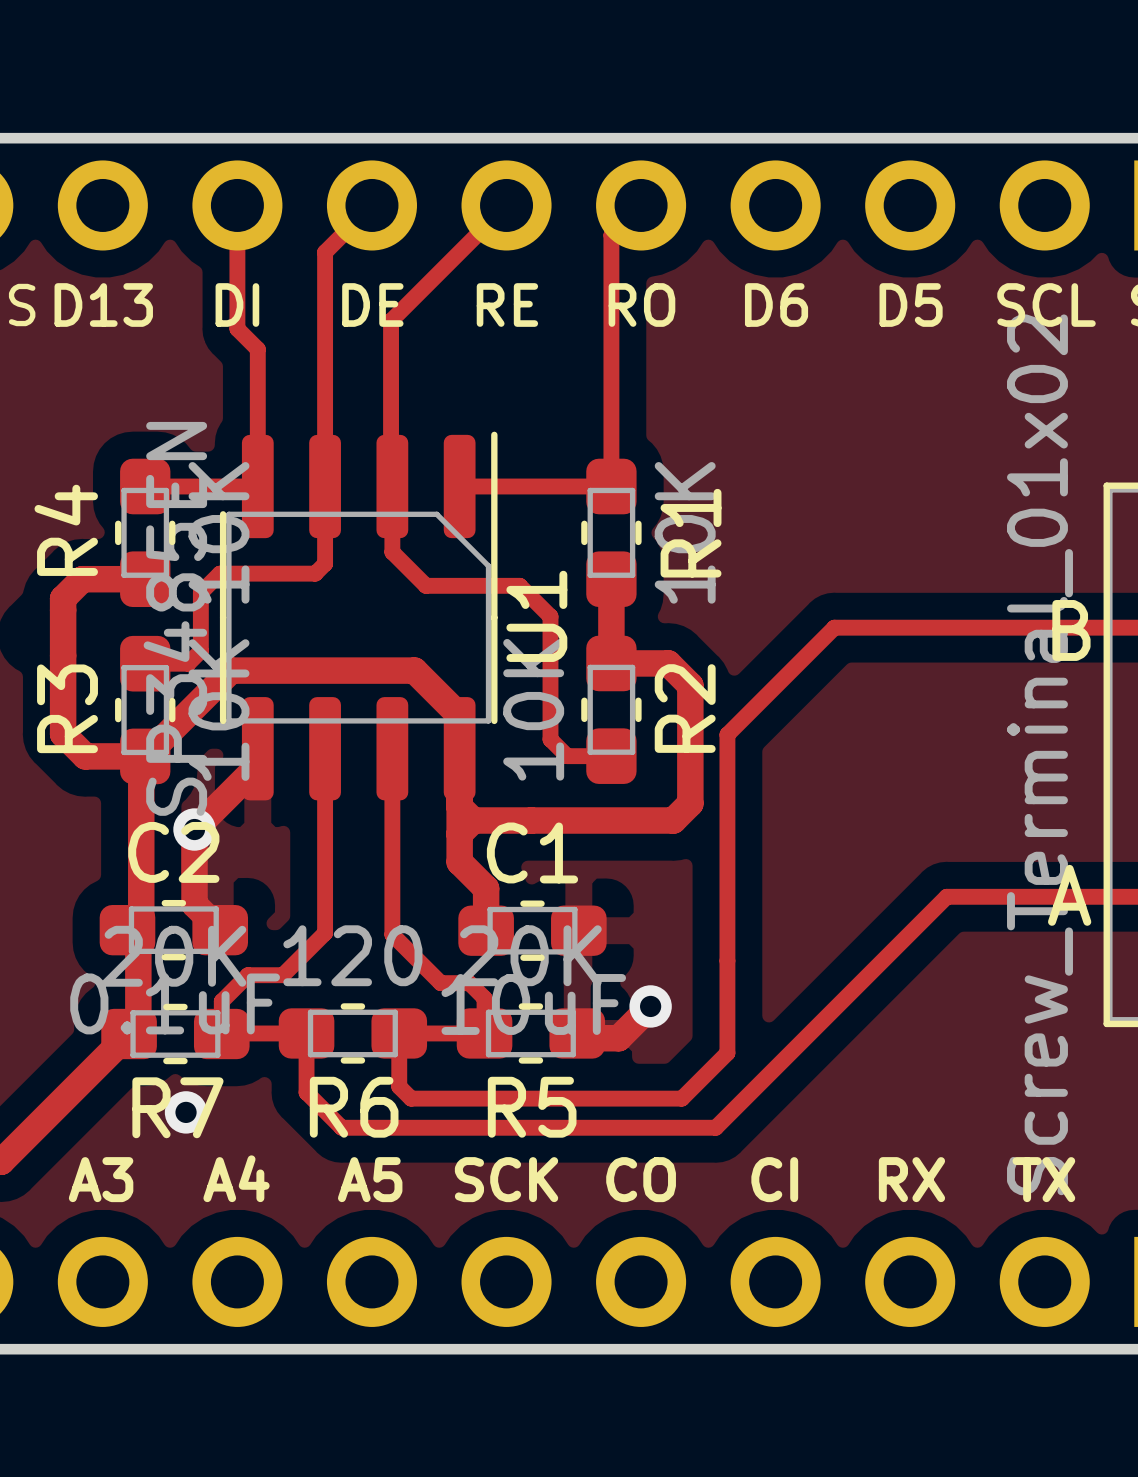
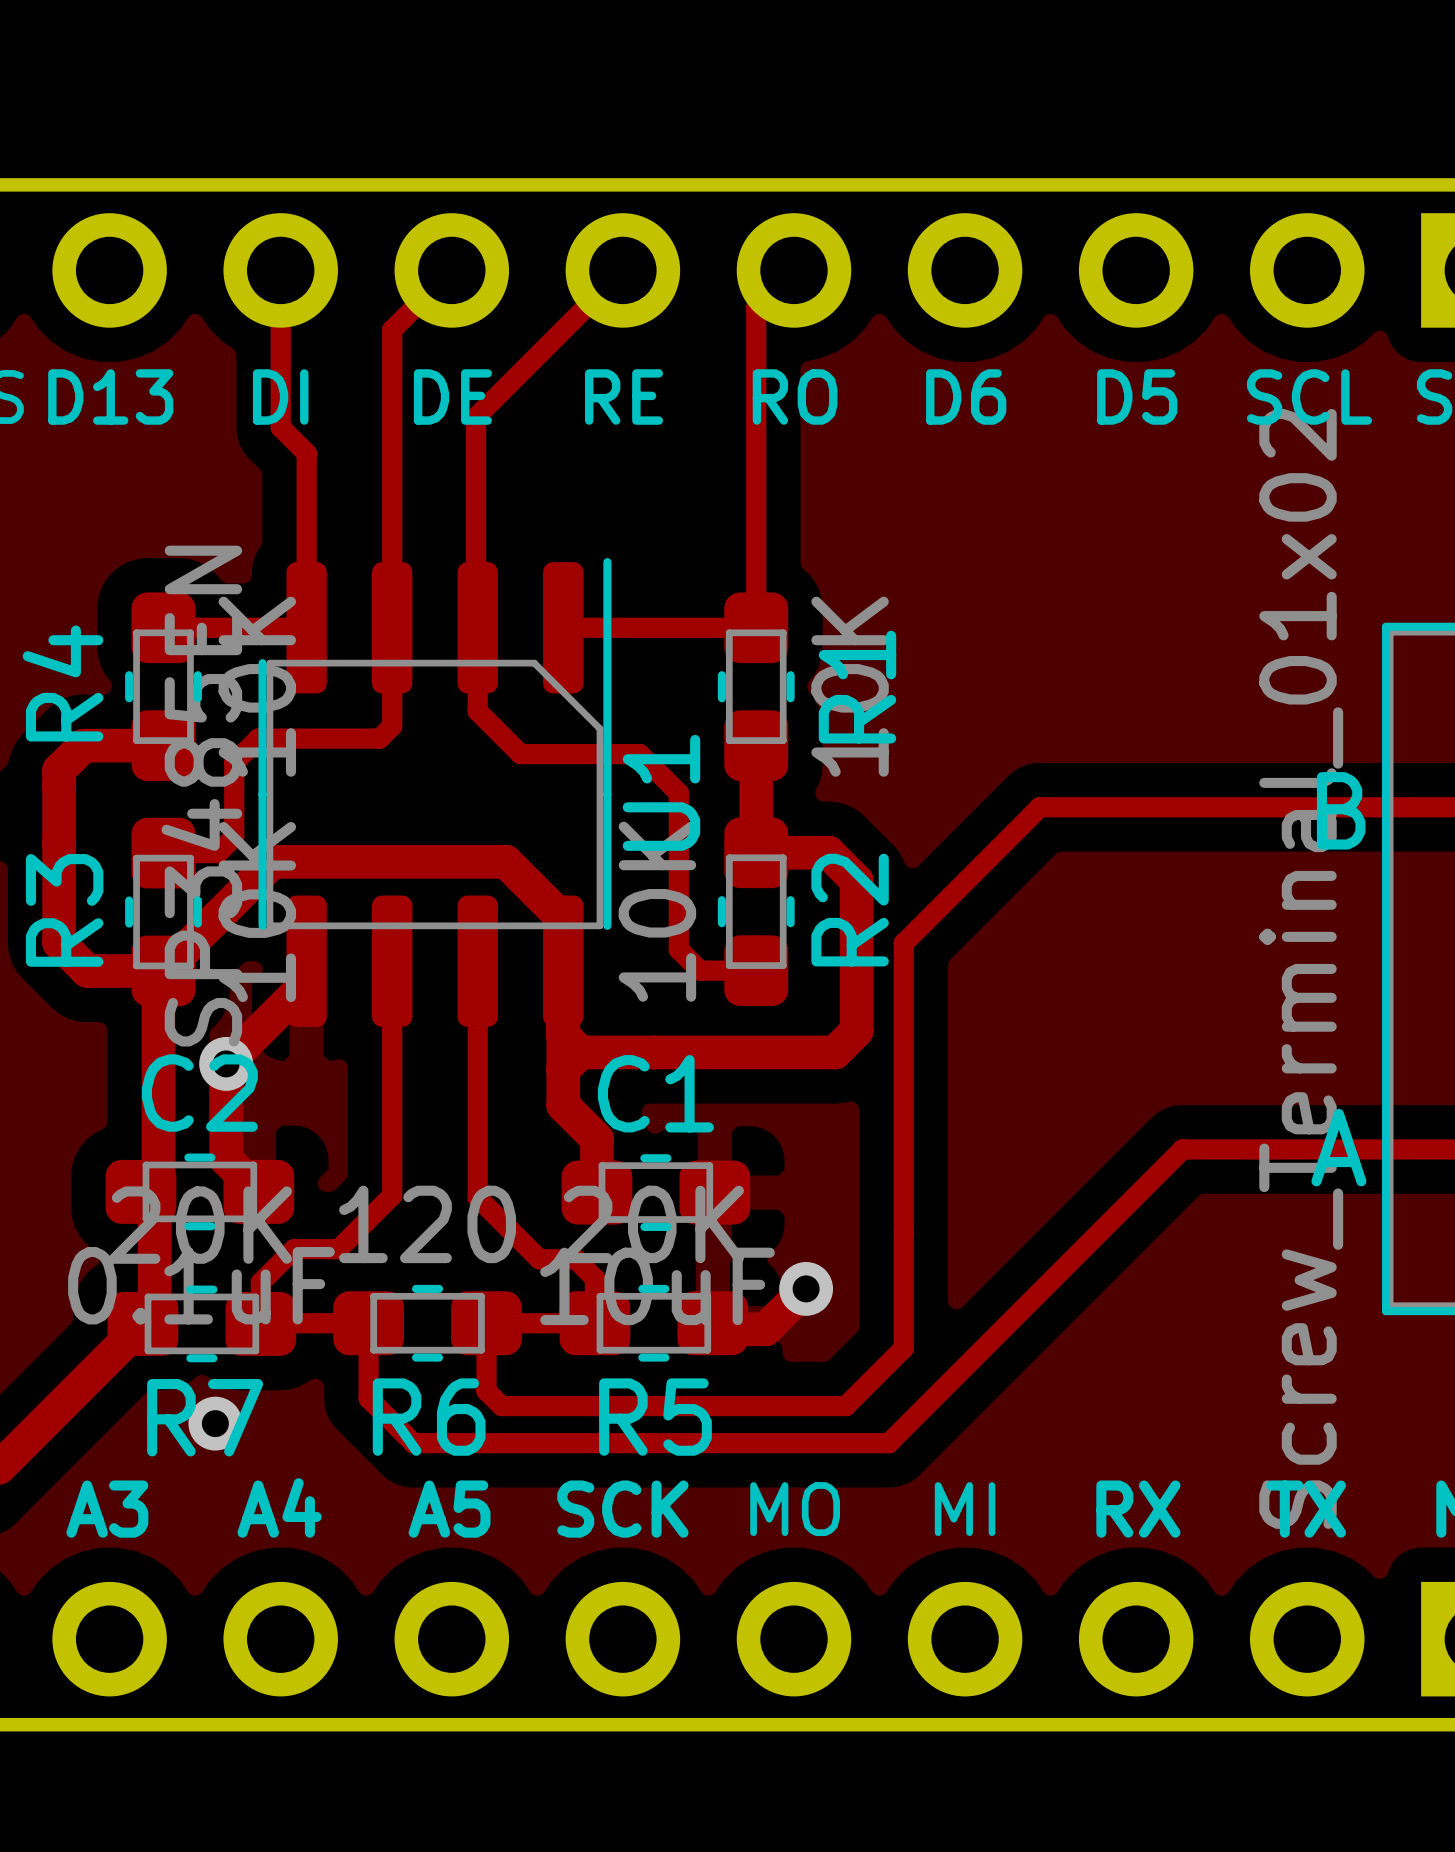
text: CO (641, 1179) -> MO (795, 1509)
text: CI (774, 1179) -> MI (965, 1509)

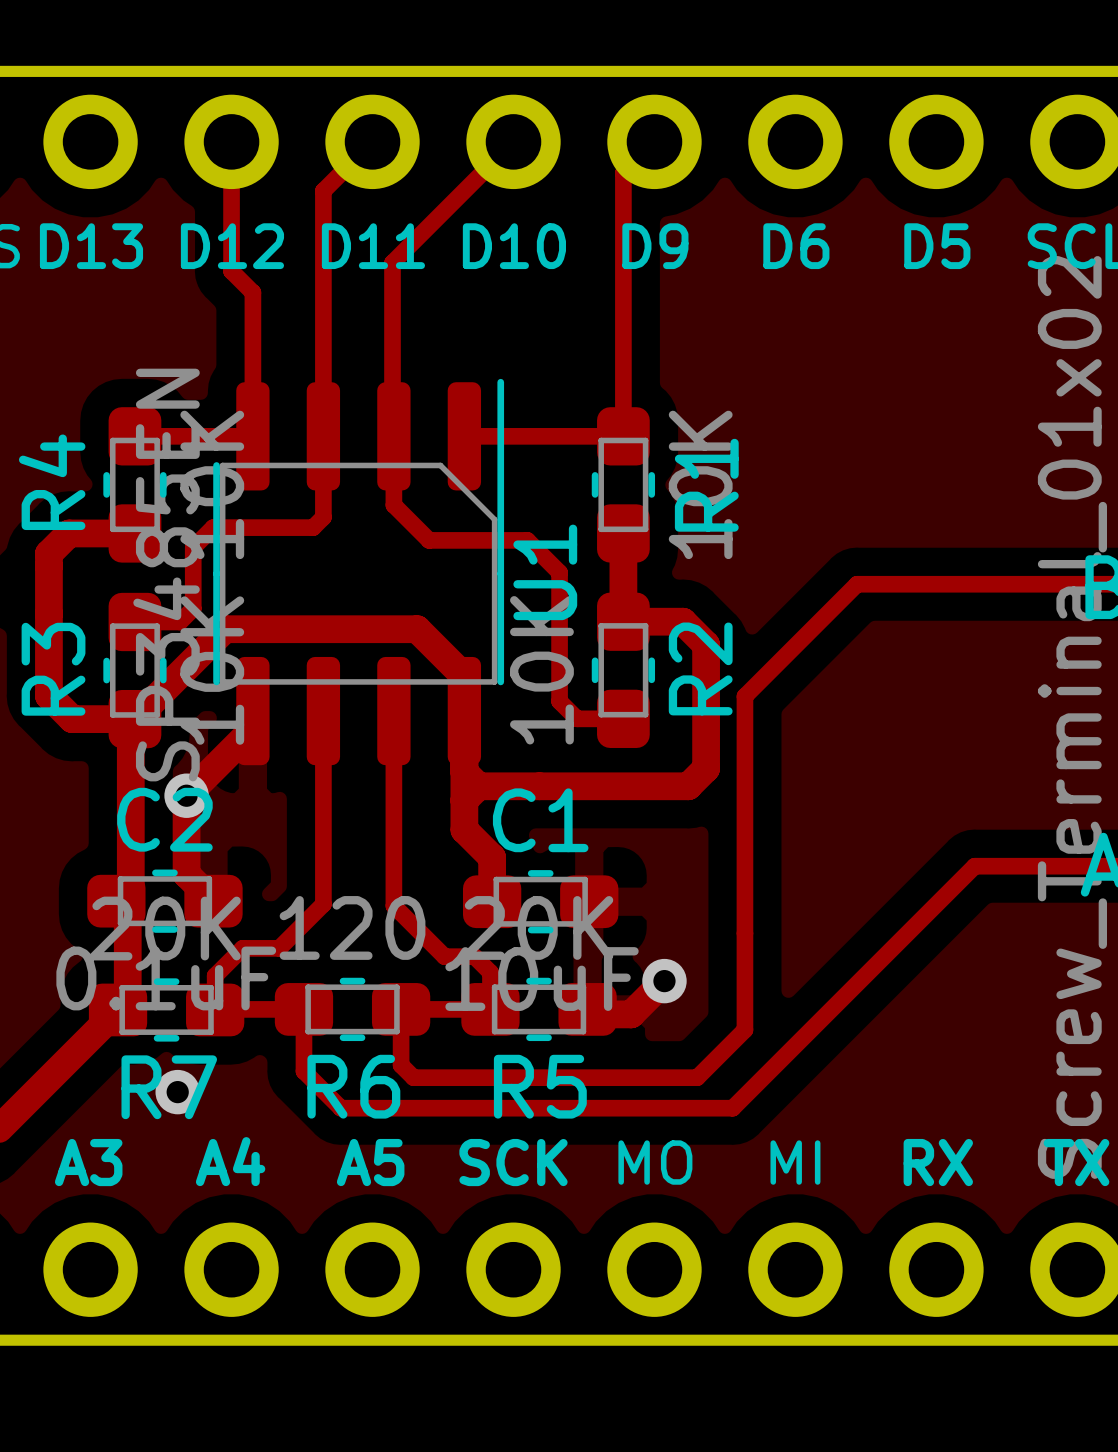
text: DI (280, 396) -> D12 (232, 246)
text: DE (452, 396) -> D11 (373, 246)
text: RE (624, 396) -> D10 (514, 246)
text: RO (795, 396) -> D9 (655, 246)

